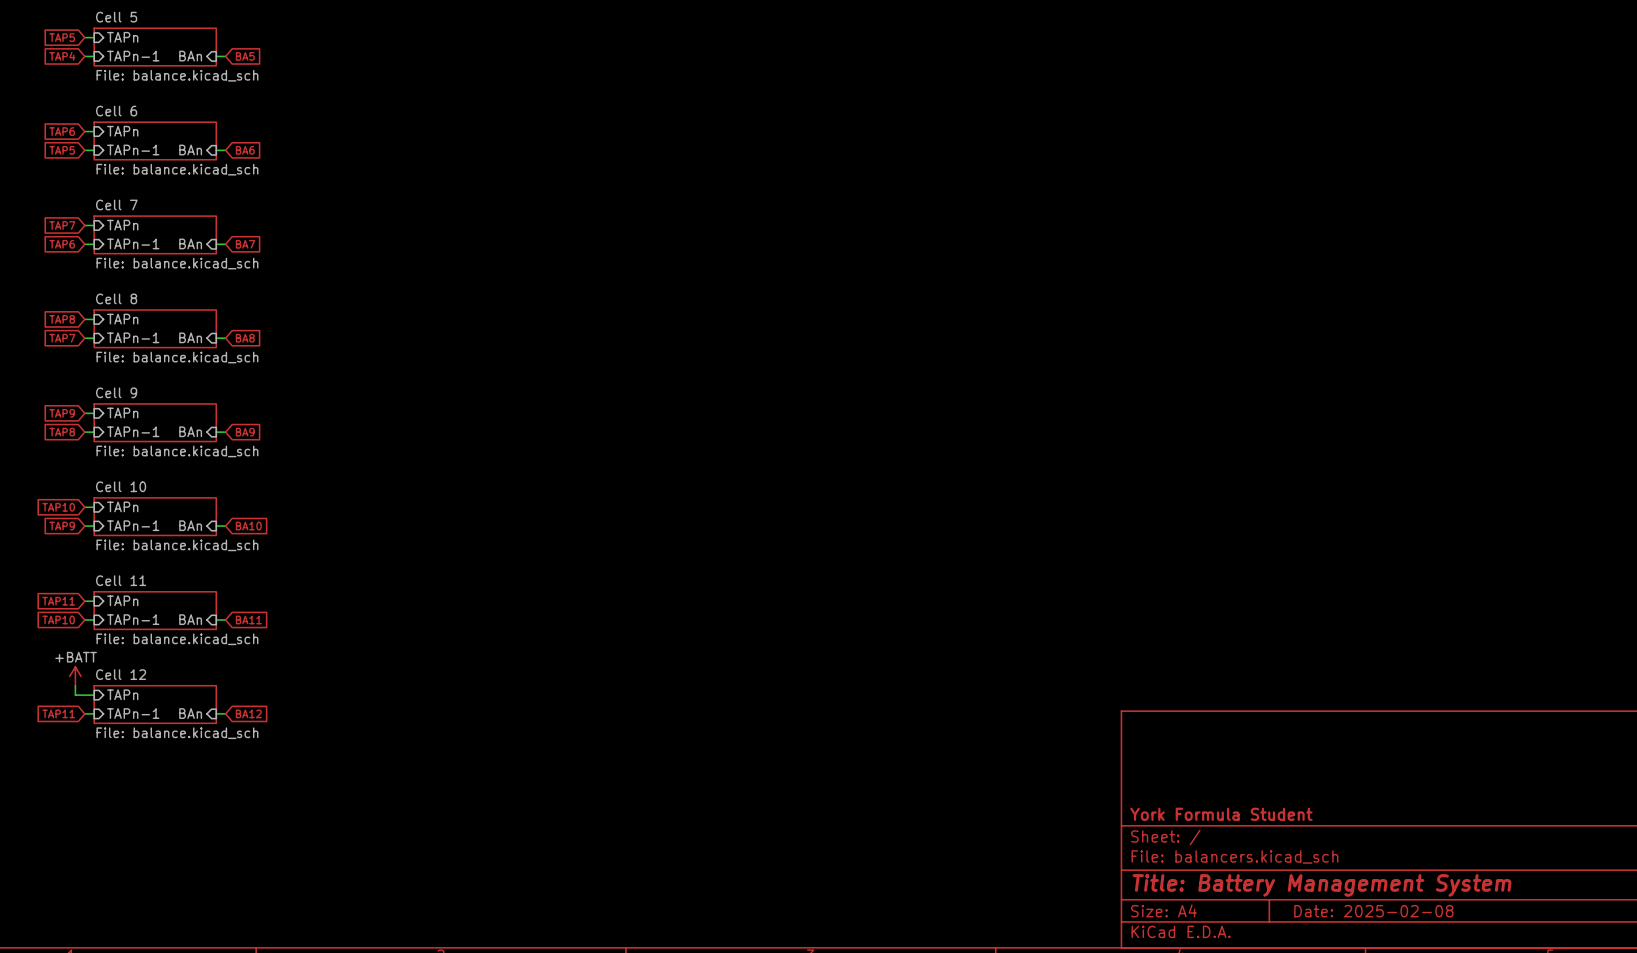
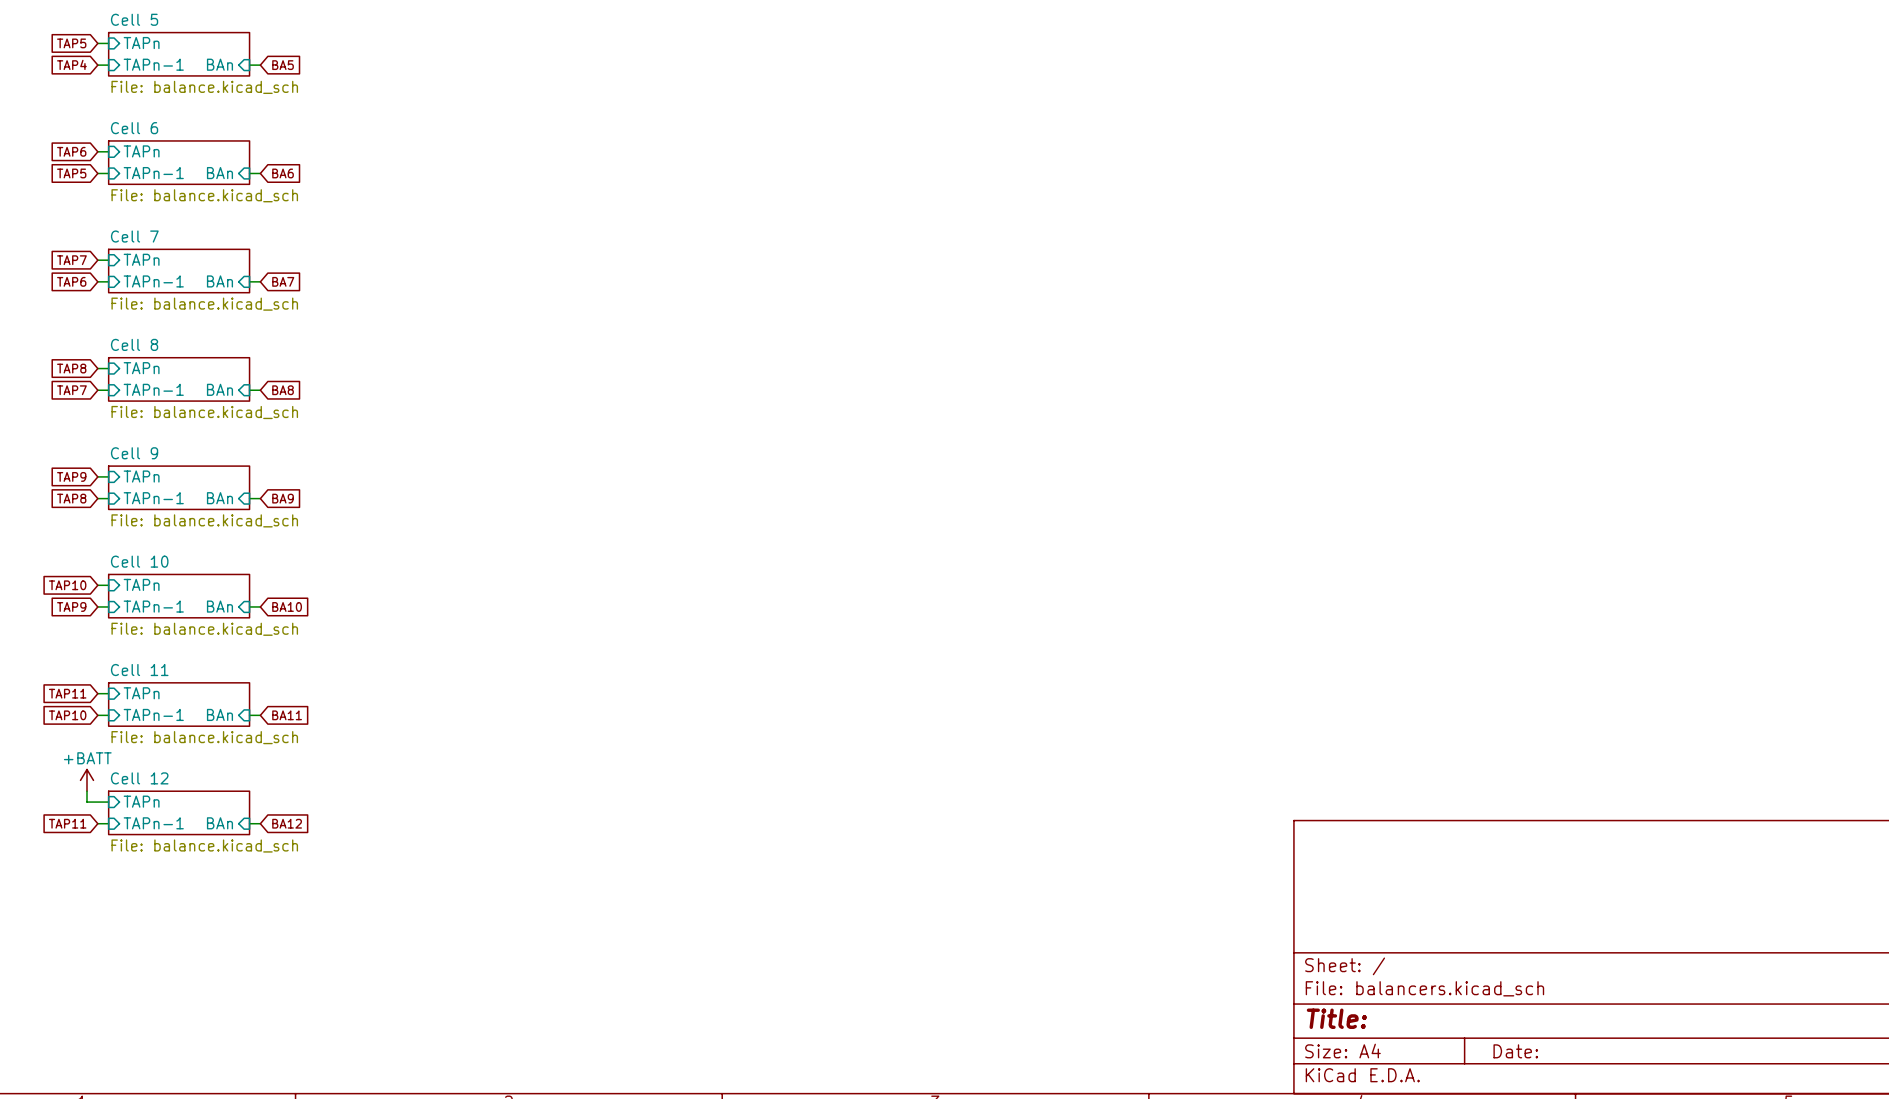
title block: York Formula Student (1221, 814) -> none
title block: Title: Battery Management System (1322, 885) -> Title: (1336, 1018)
title block: Date: 2025-02-08 (1373, 911) -> Date: (1515, 1051)

